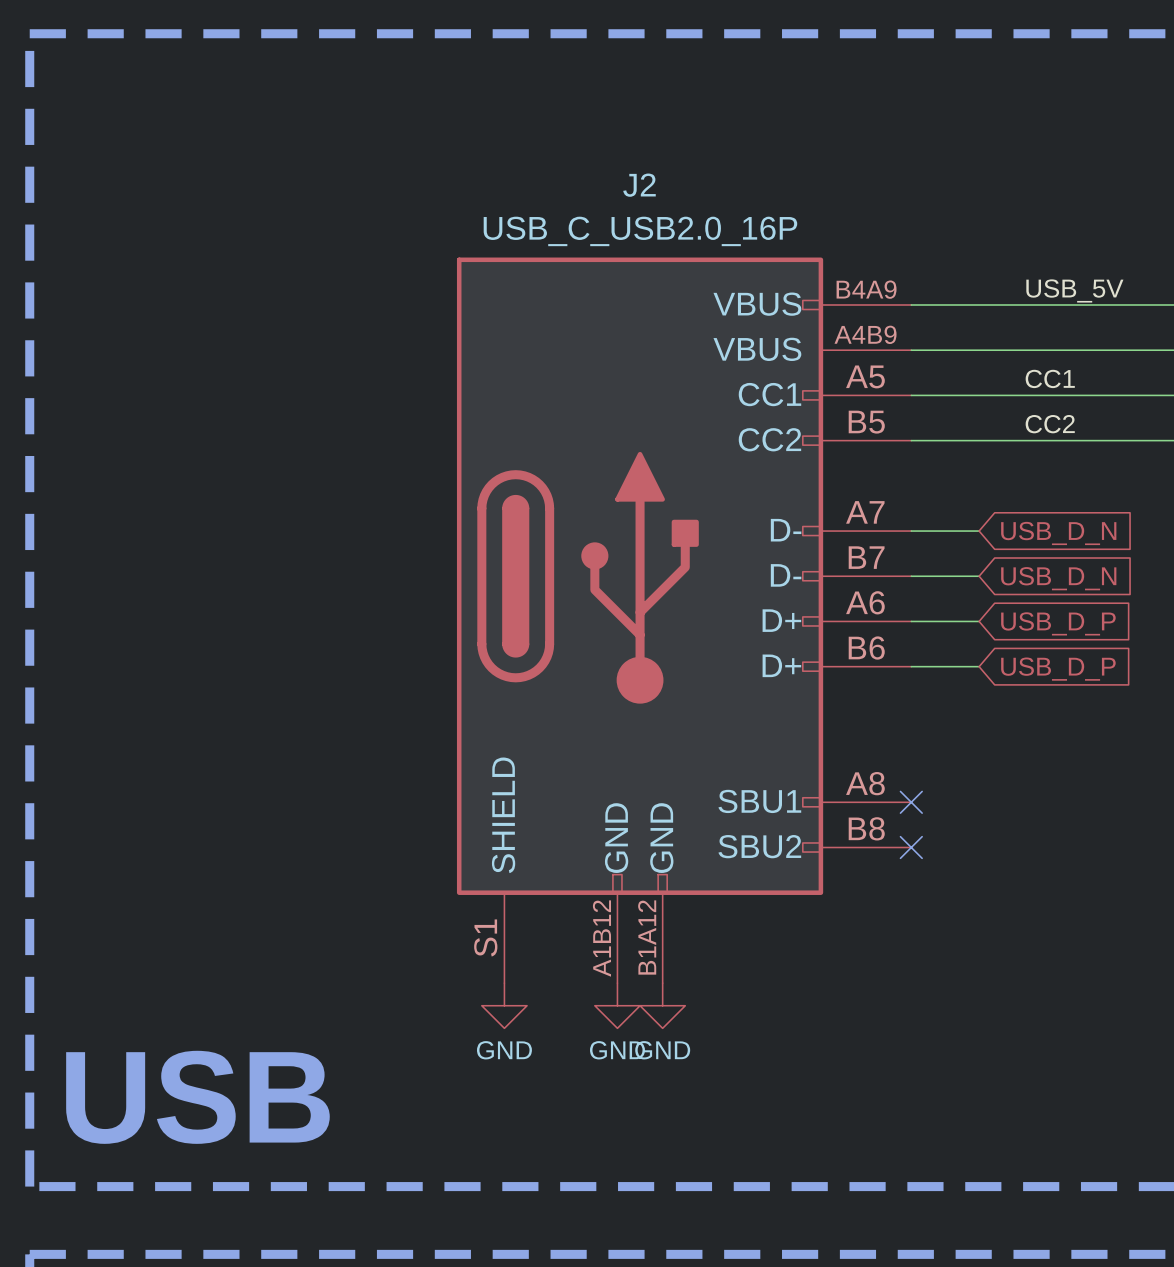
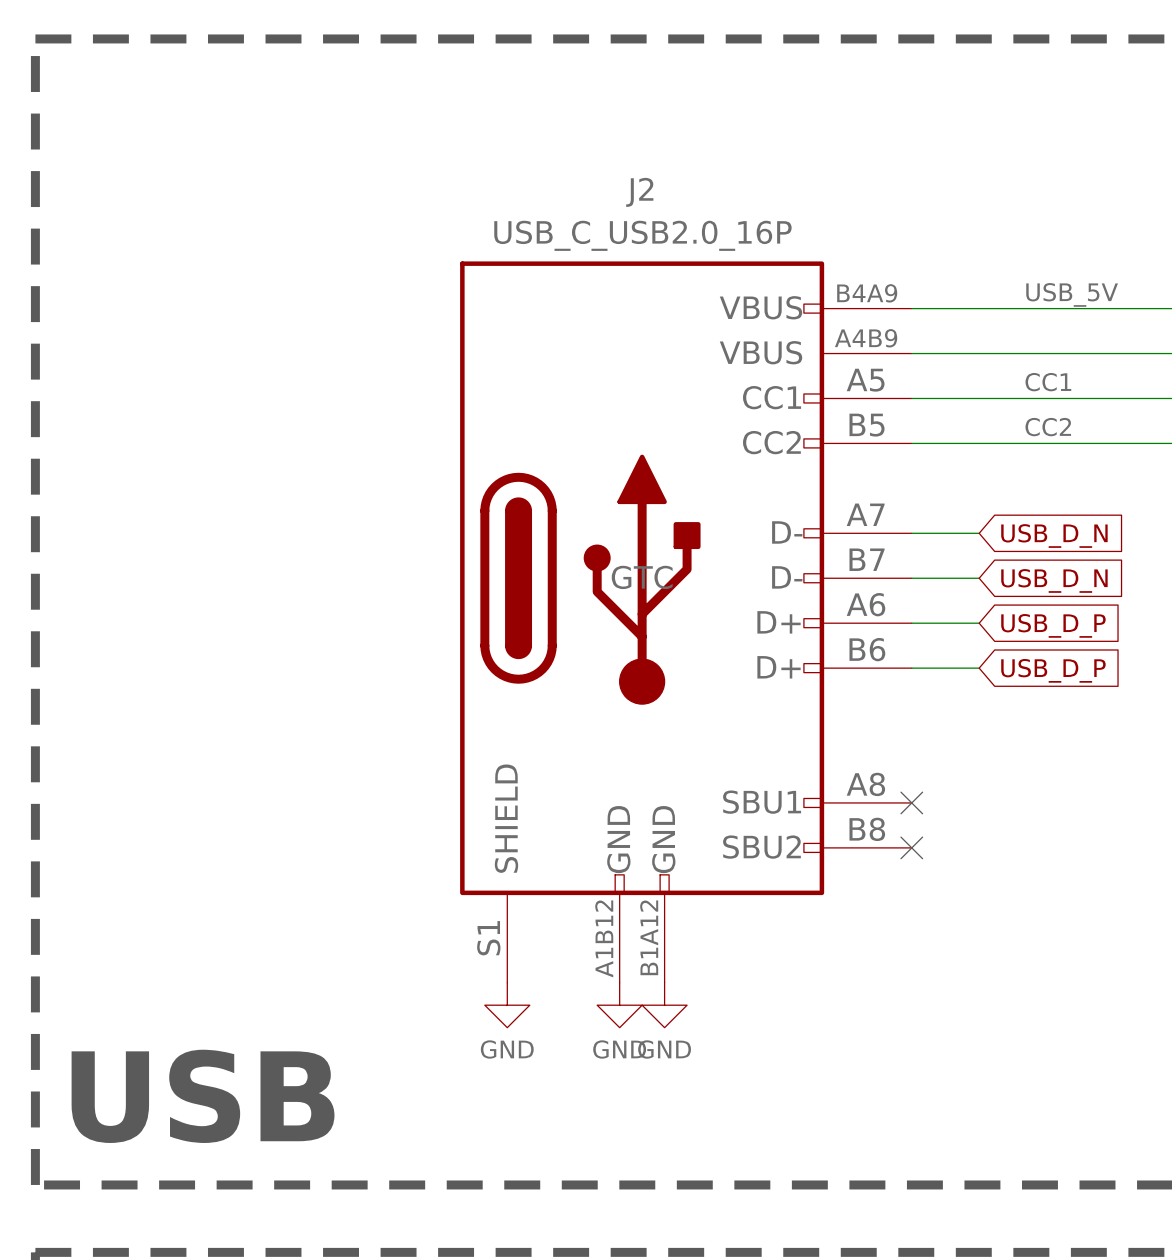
J2 text: none -> GTC (642, 577)

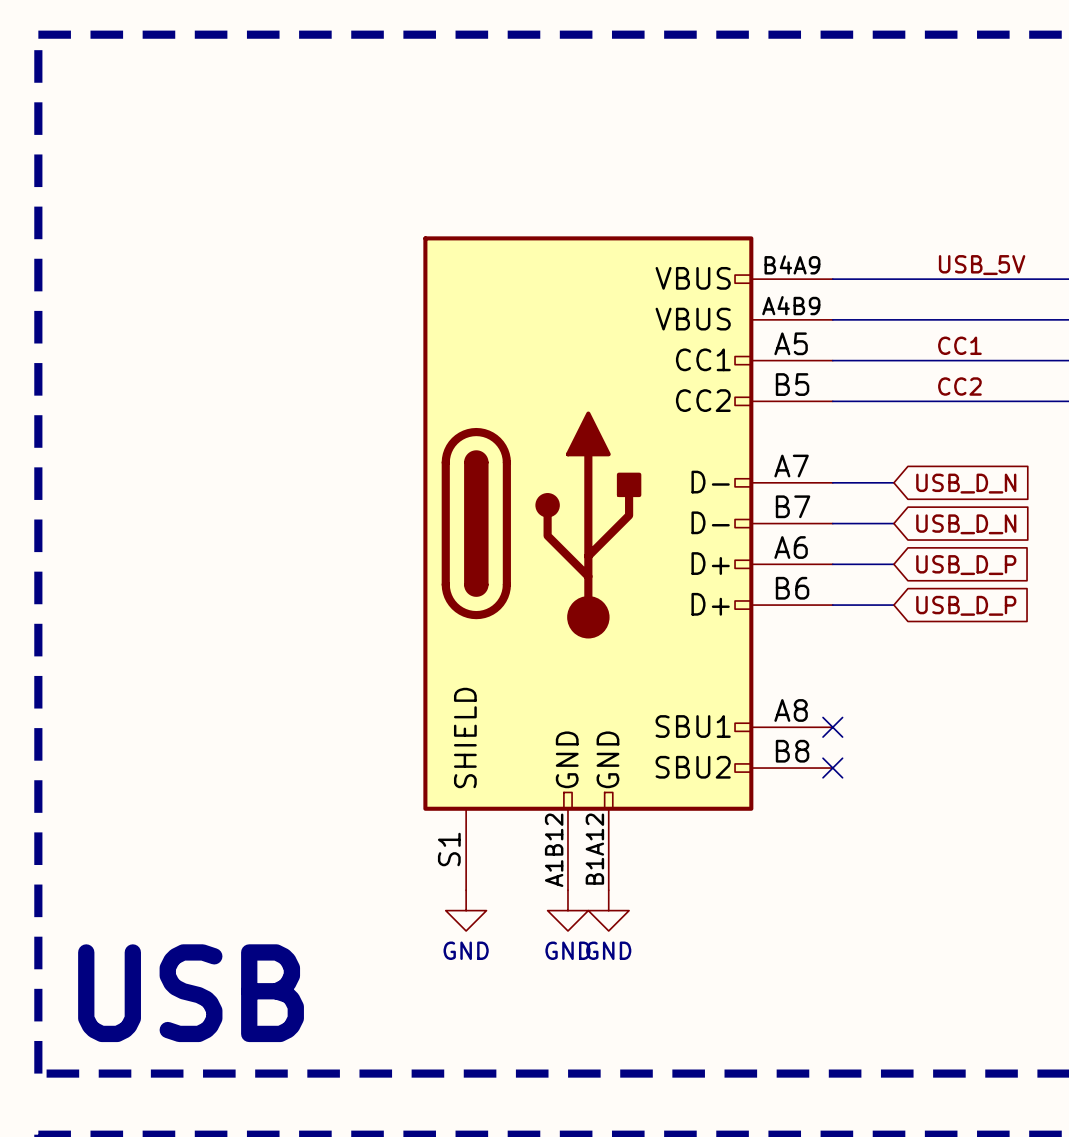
J2 name: J2 (639, 192) -> none
J2 value: USB_C_USB2.0_16P (642, 235) -> none
J2 text: GTC (642, 577) -> none

